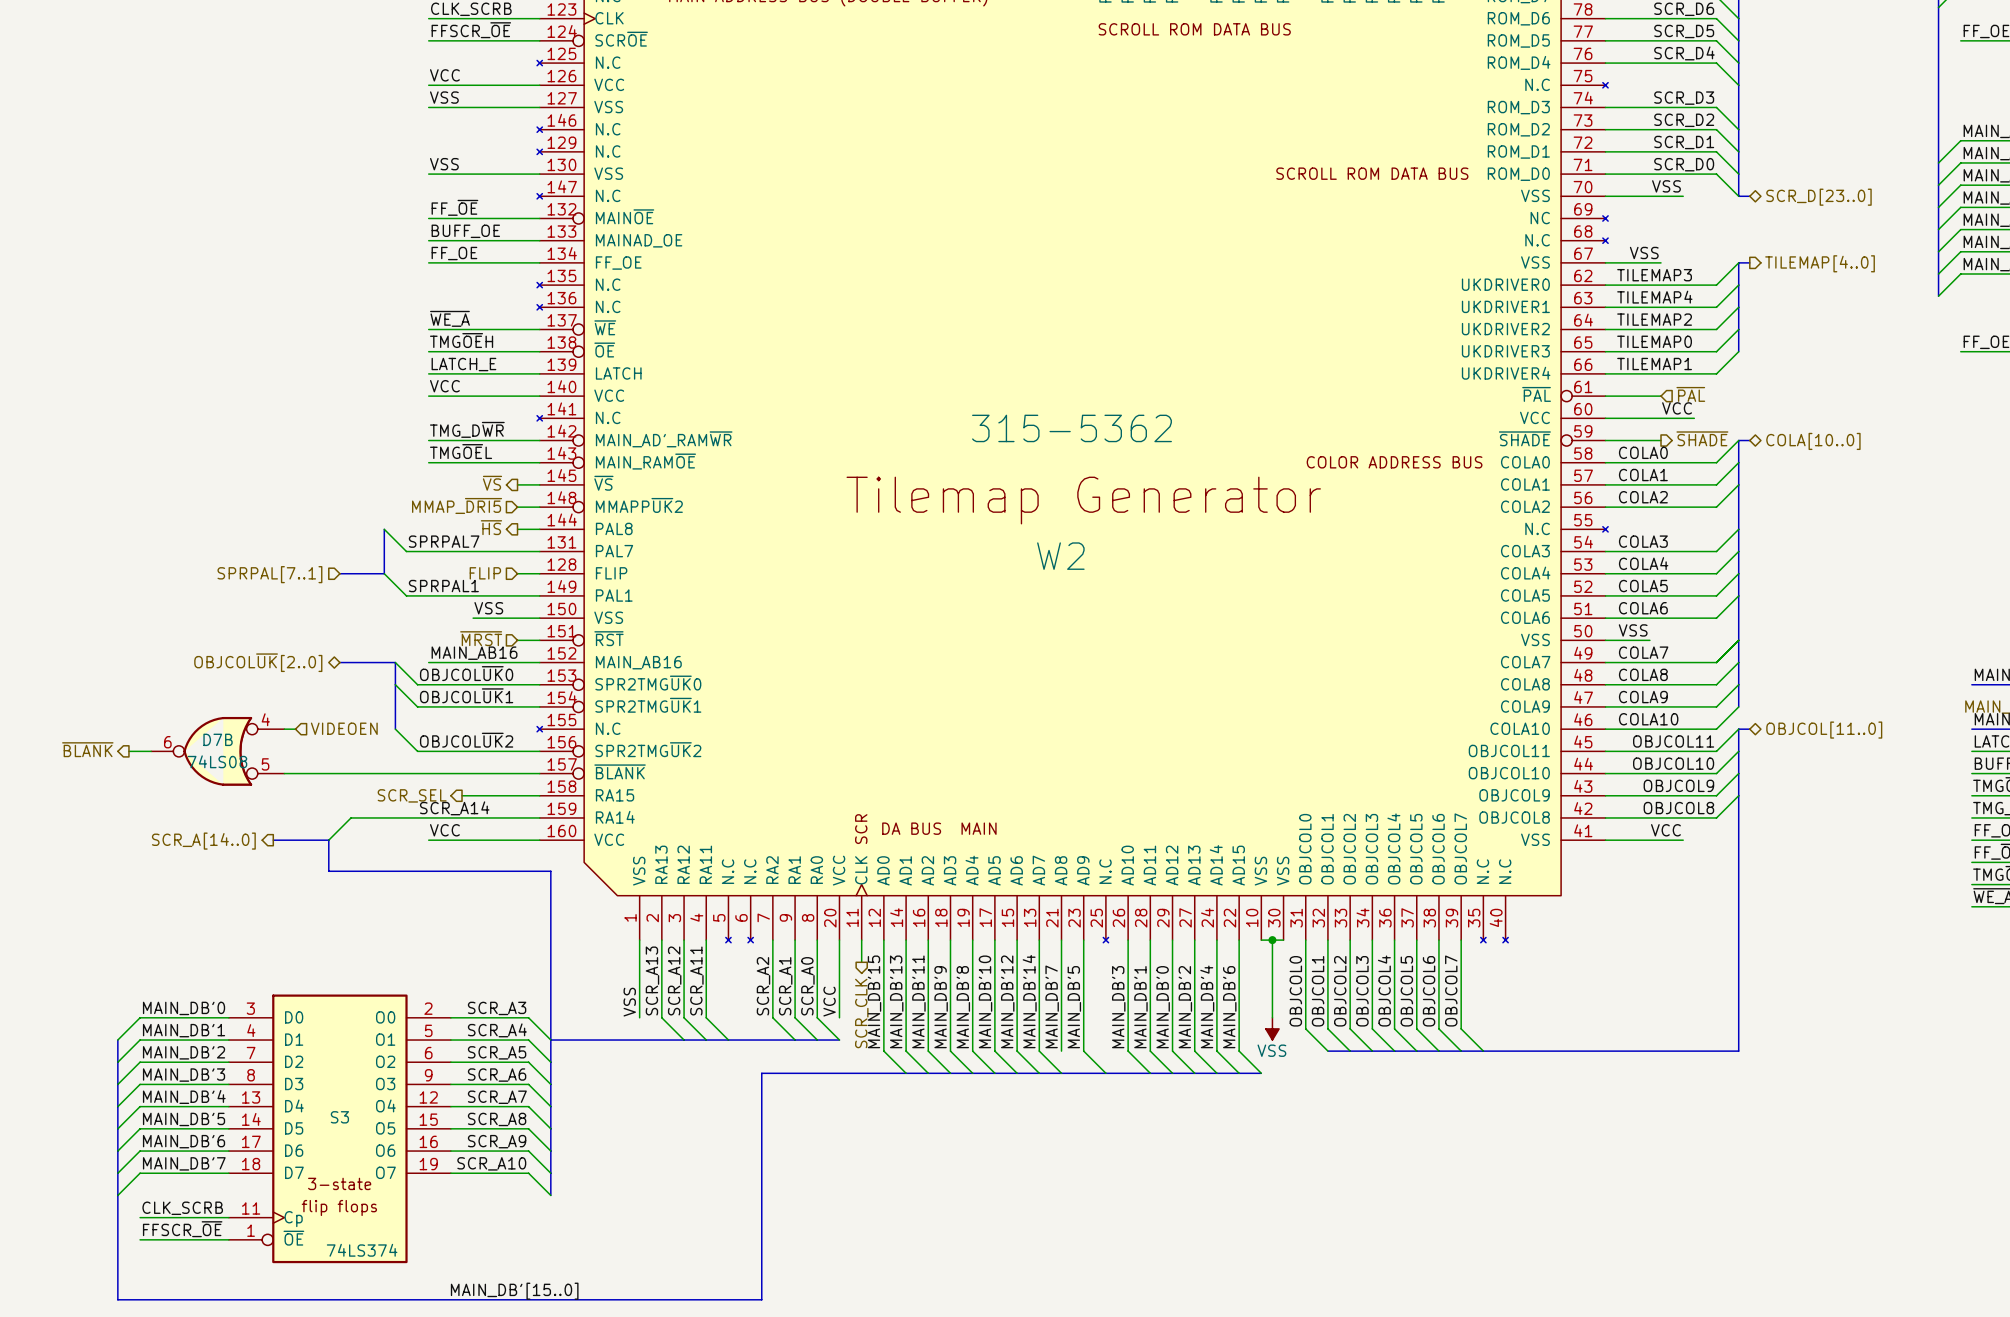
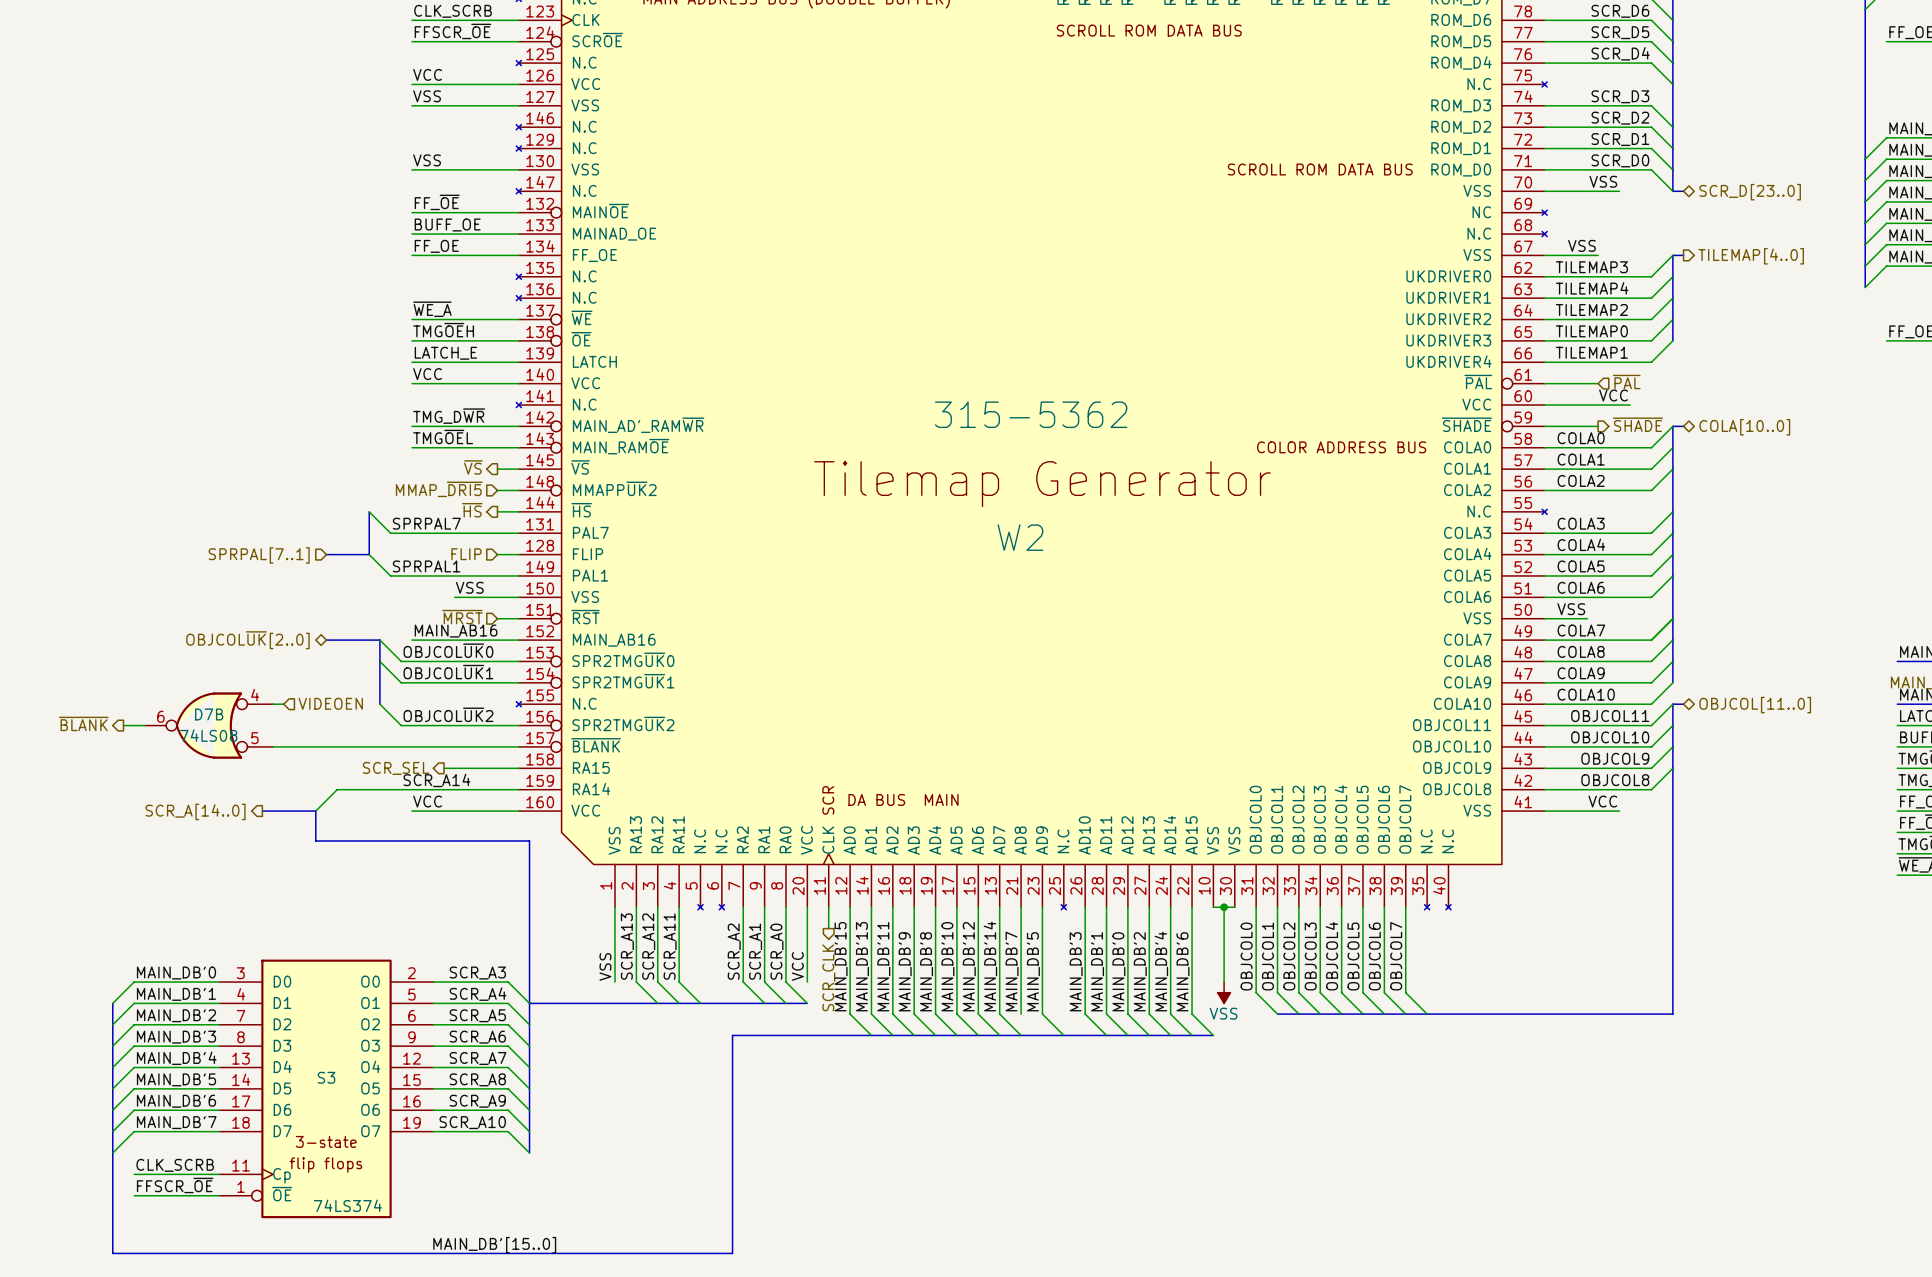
W2 pin name: PAL8 (614, 528) -> ~{HS} (581, 510)

